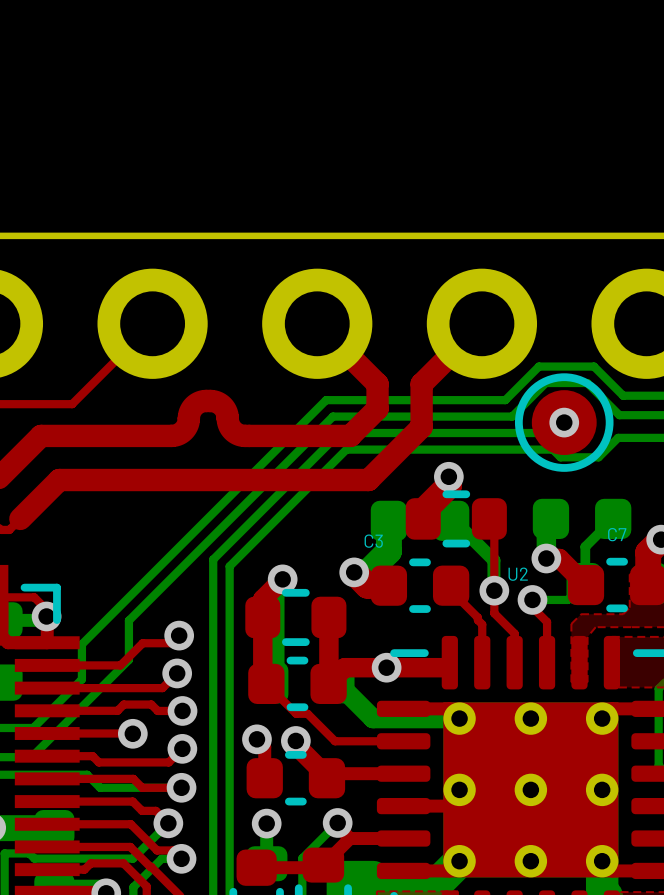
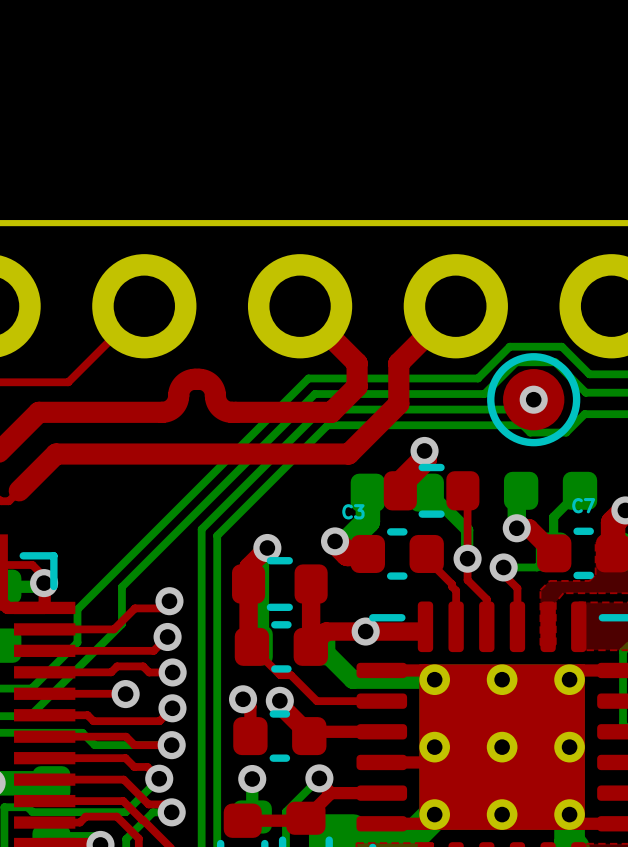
U2 name: U2 (518, 574) -> none

